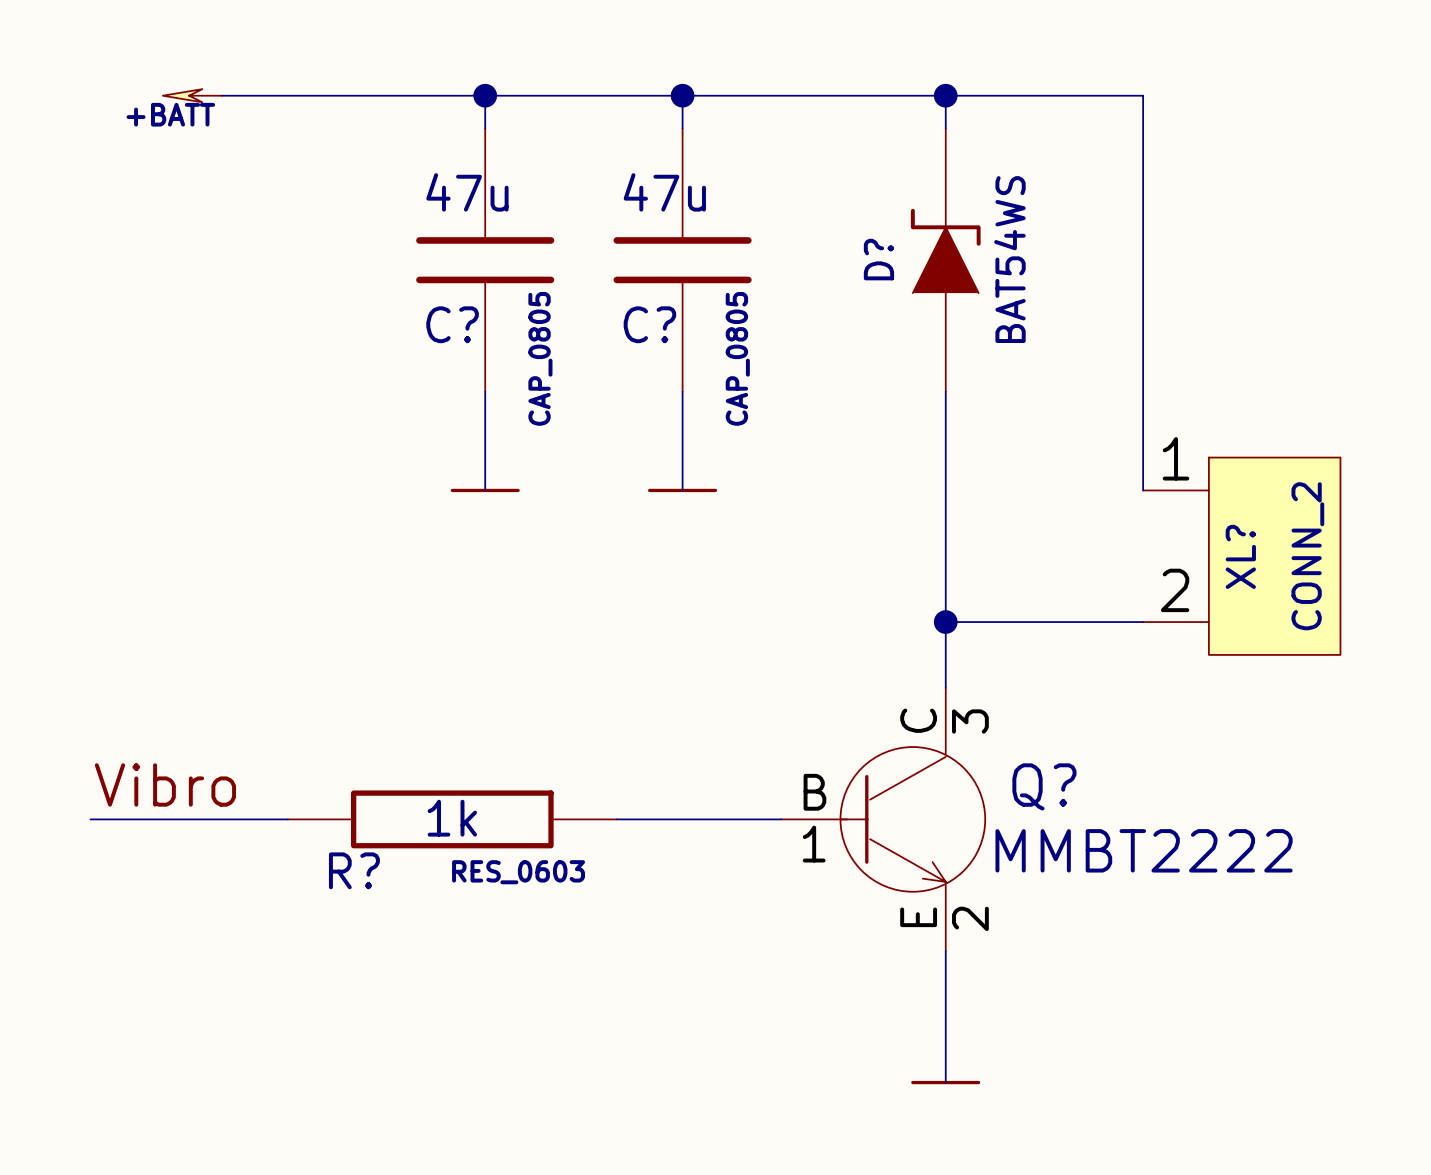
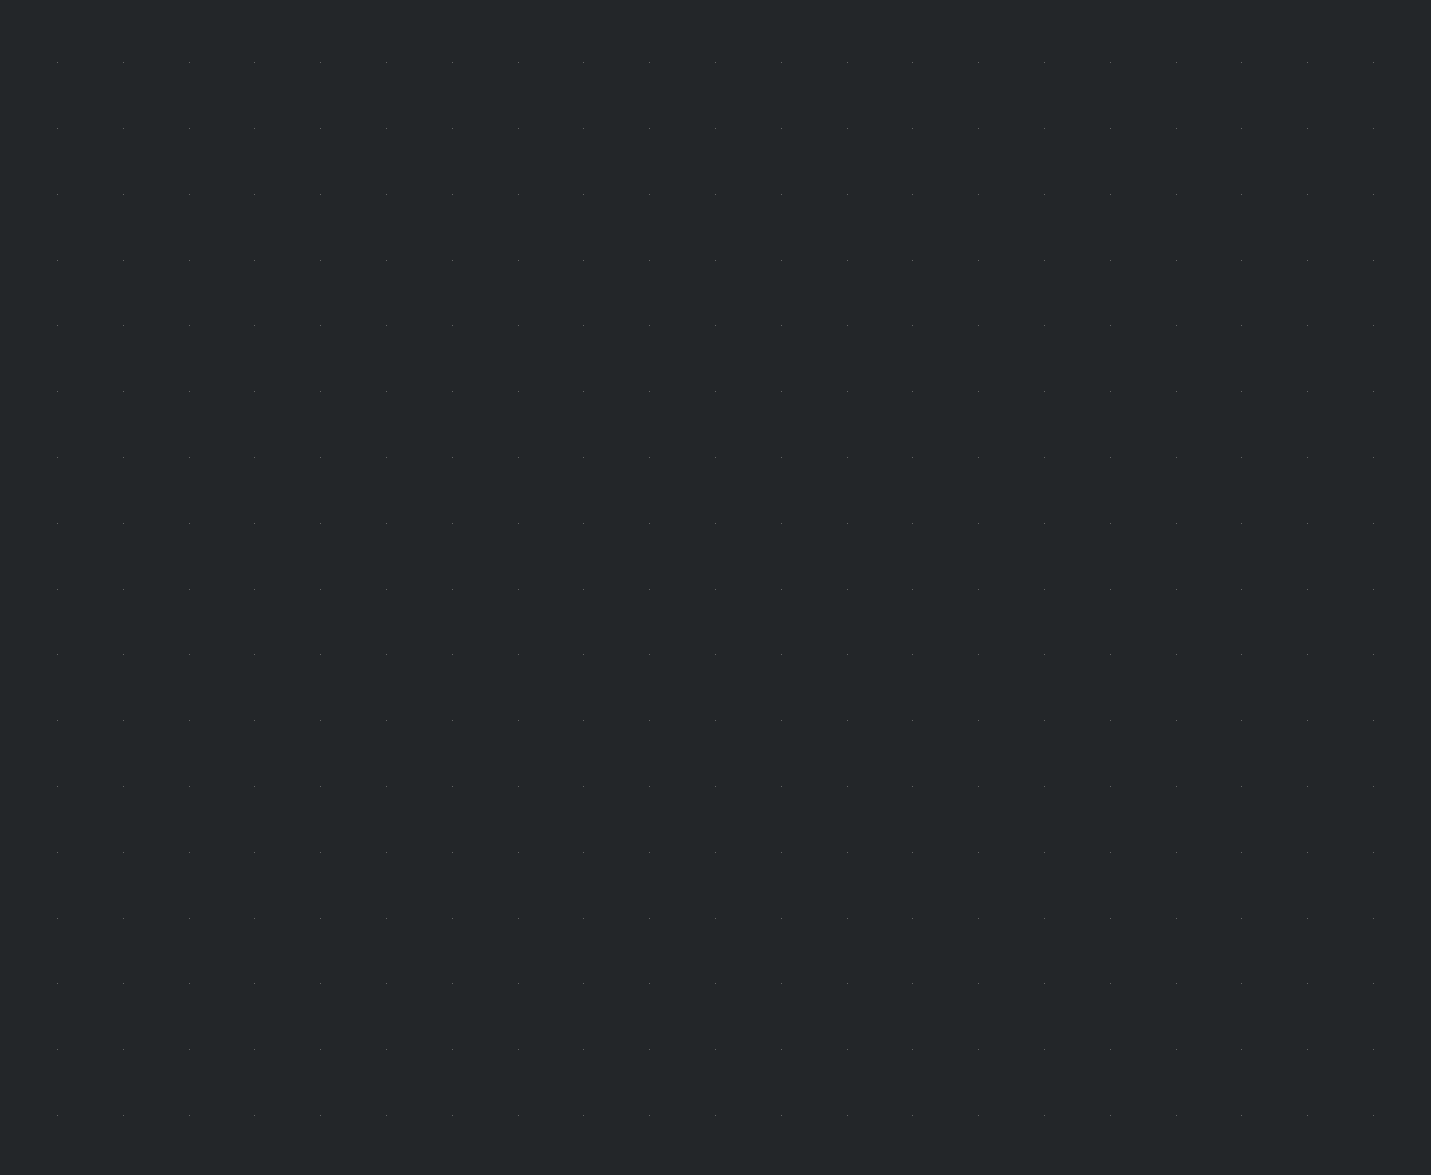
power symbol: +BATT (192, 95) -> none
wire: (222, 95) (1143, 95) (1143, 490) -> none
wire: (485, 95) (485, 128) -> none
junction: (485, 95) -> none
wire: (682, 95) (682, 128) -> none
junction: (682, 95) -> none
wire: (945, 95) (945, 128) -> none
junction: (945, 95) -> none
C?: 47u (485, 260) -> none
C?: 47u (682, 260) -> none
D?: BAT54WS (945, 260) -> none
wire: (485, 391) (485, 490) -> none
wire: (682, 391) (682, 490) -> none
wire: (945, 391) (945, 687) -> none
power symbol: (485, 490) -> none
power symbol: (682, 490) -> none
XL?: CONN_2 (1241, 556) -> none
wire: (945, 622) (1143, 622) -> none
junction: (945, 622) -> none
label: Vibro (165, 784) -> none
wire: (90, 819) (287, 819) -> none
R?: 1k (452, 819) -> none
wire: (616, 819) (781, 819) -> none
Q?: MMBT2222 (883, 819) -> none
wire: (945, 950) (945, 1082) -> none
power symbol: (945, 1082) -> none

